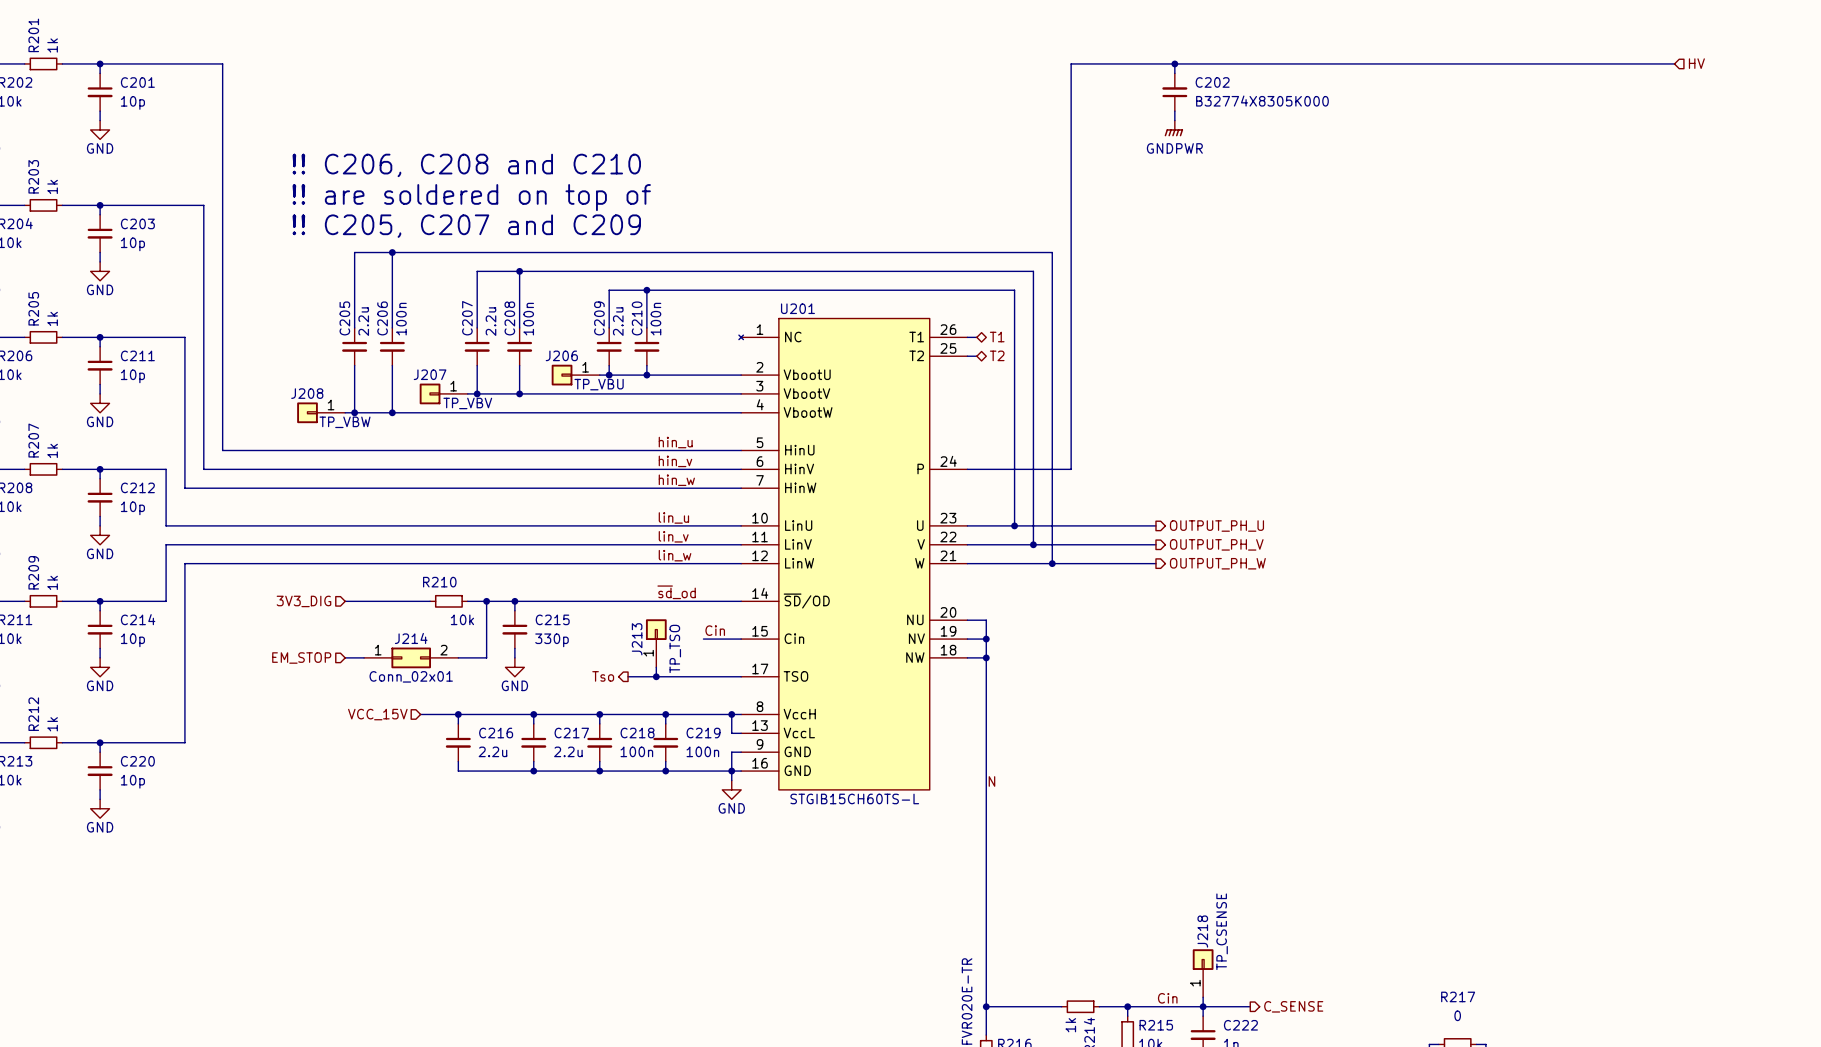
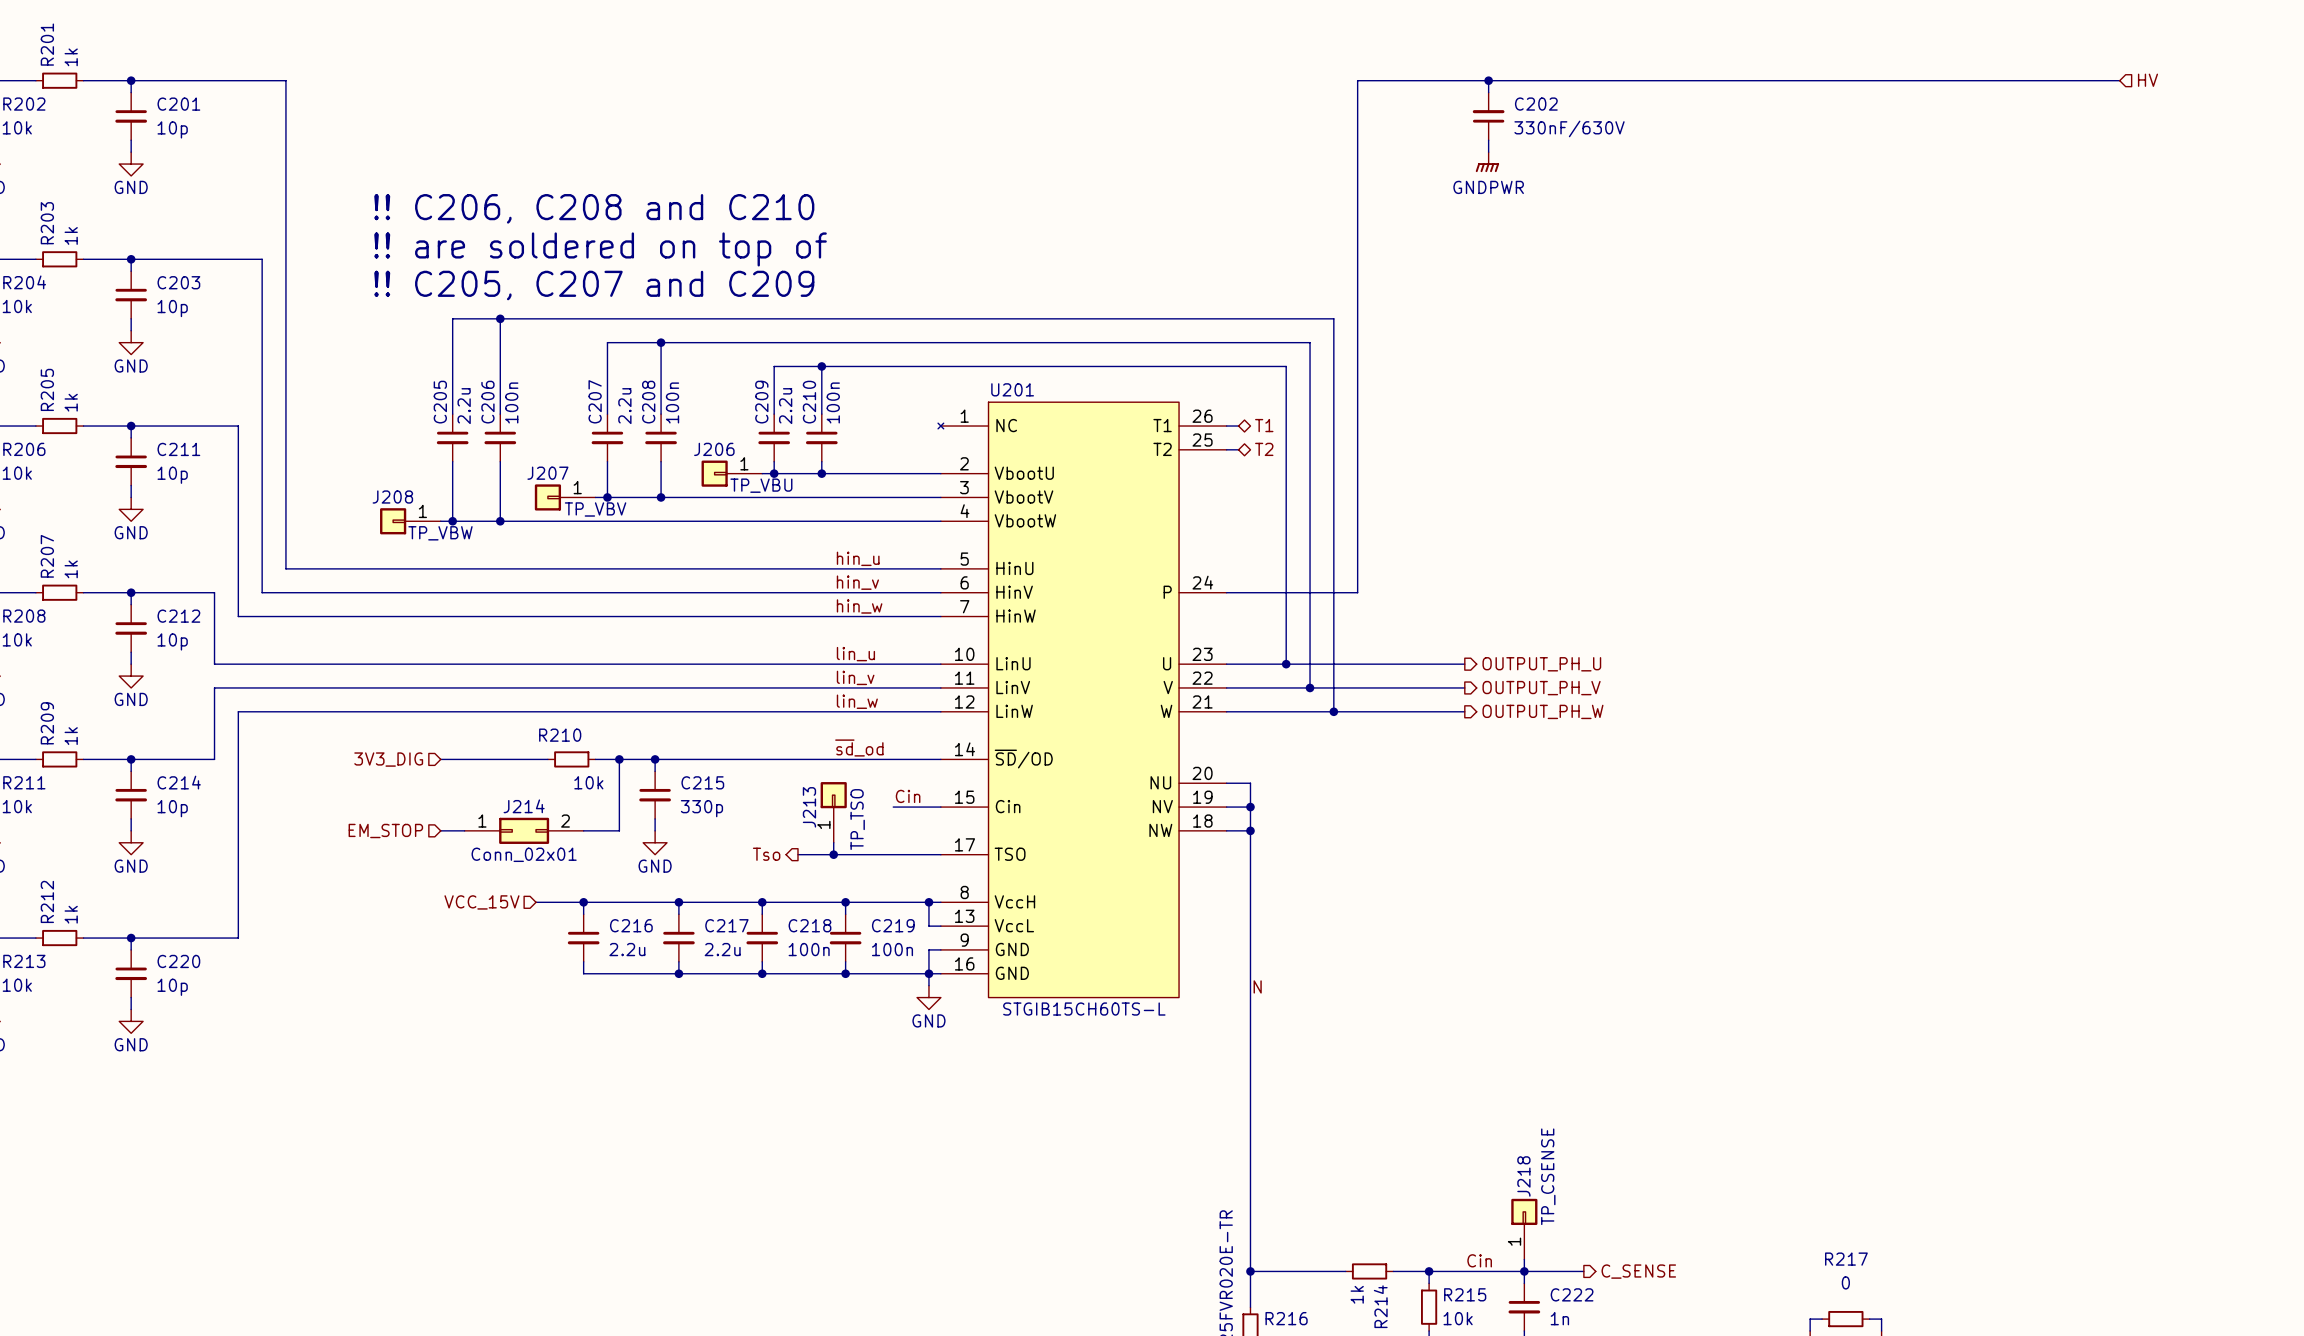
C202 value: B32774X8305K000 (1262, 101) -> 330nF/630V (1569, 128)

